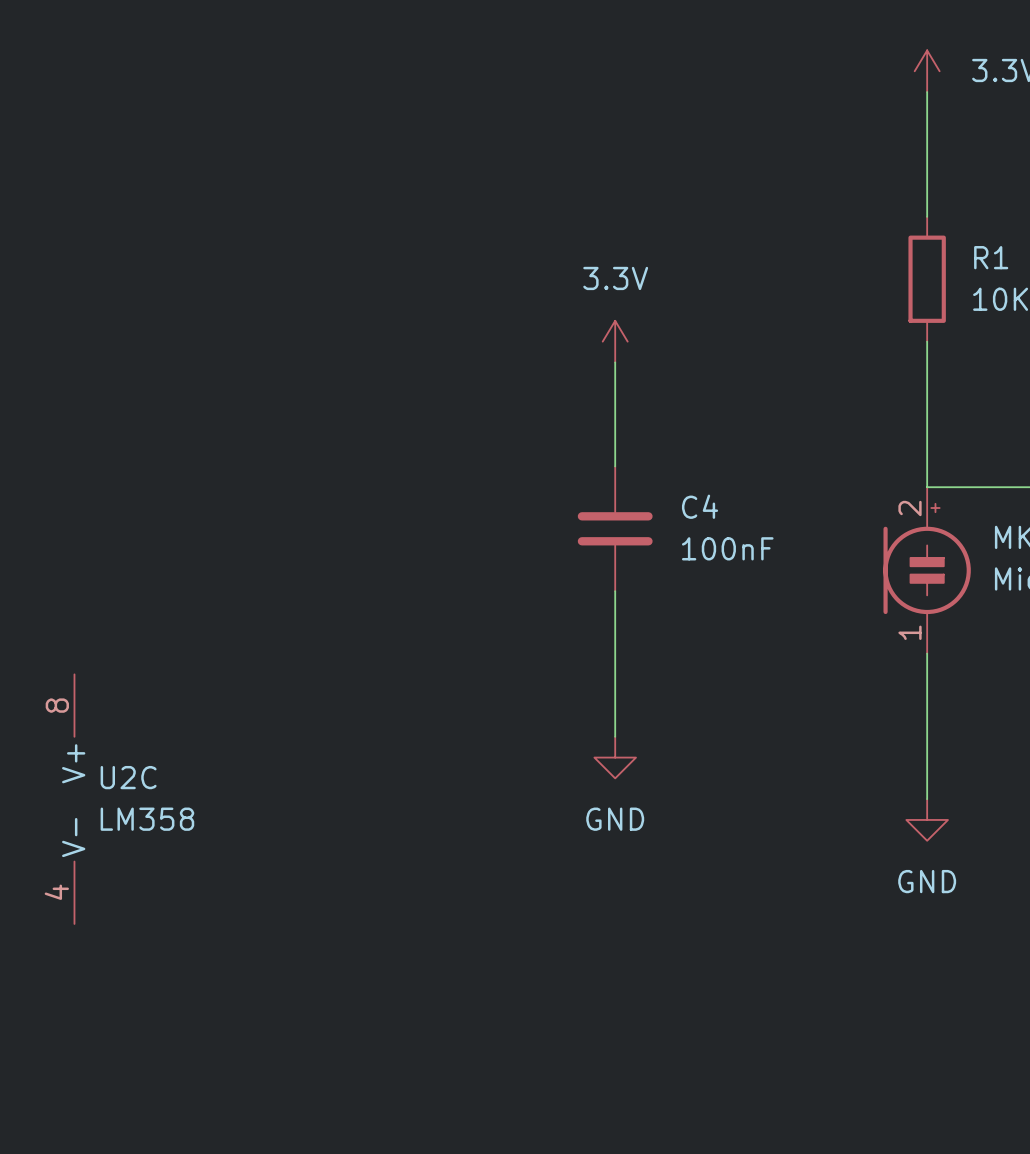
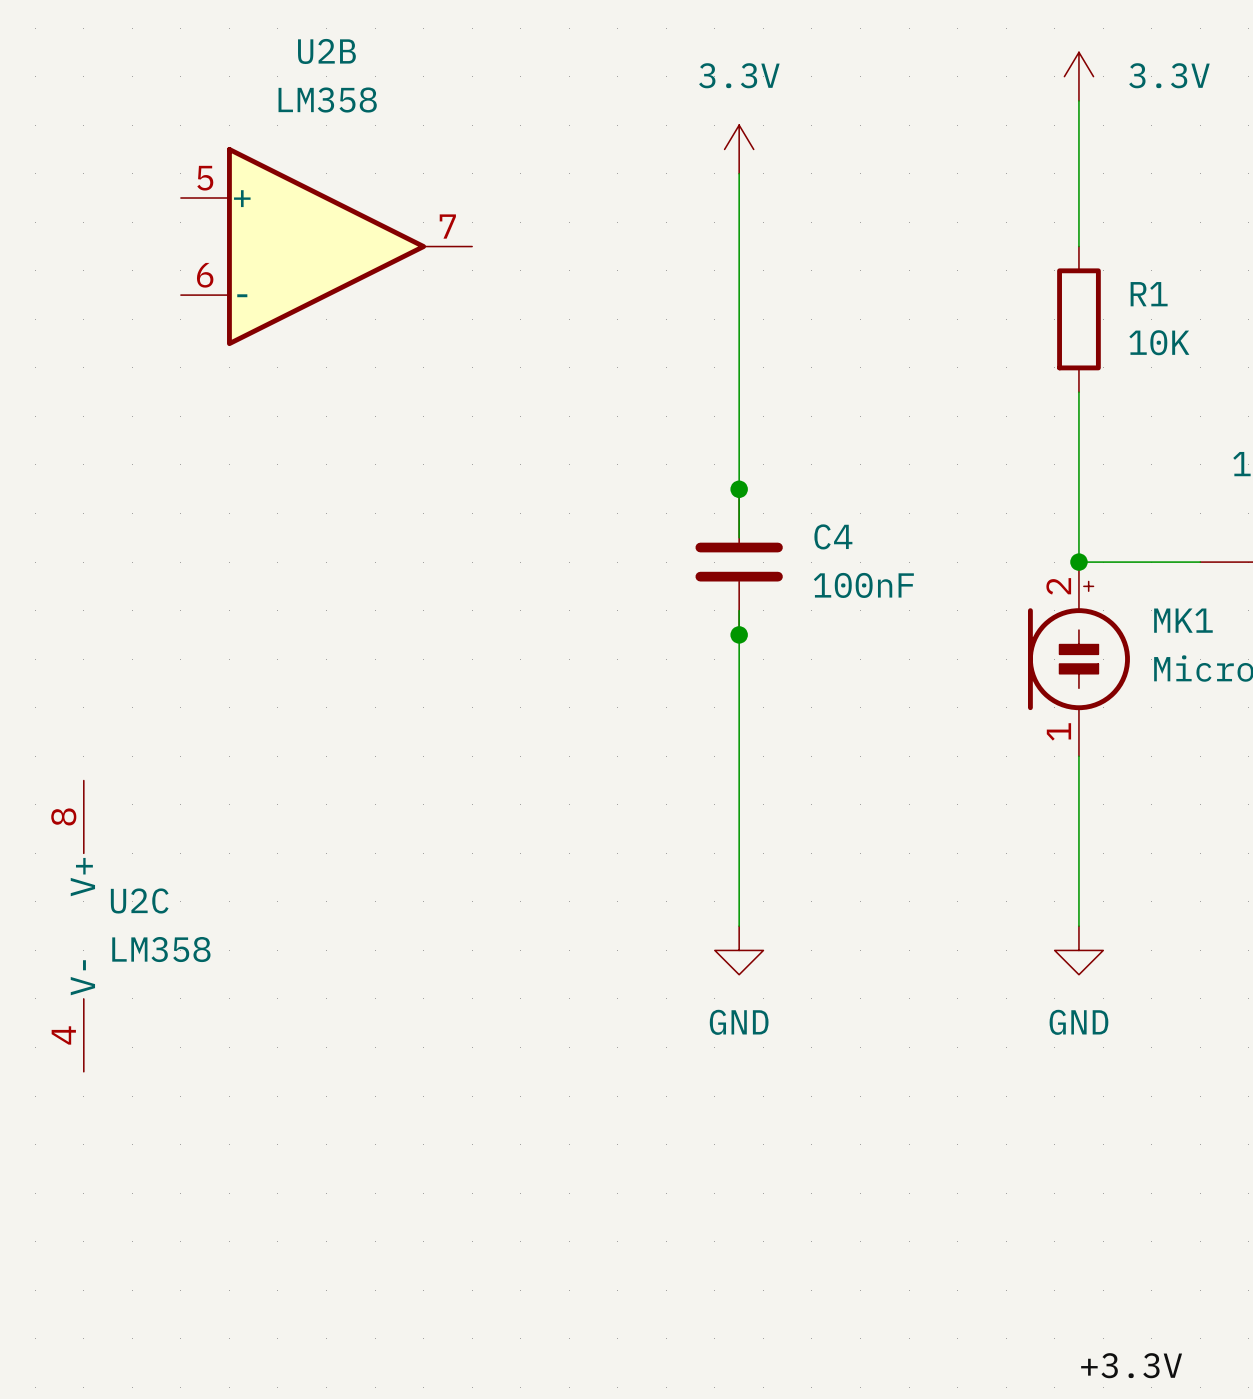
wire: none -> (739, 173) (739, 537)
U2B: none -> LM358 (326, 246)
power symbol position: 3.3V (615, 341) -> 3.3V (739, 149)
wire: (615, 362) (615, 466) -> none
junction: none -> (739, 489)
junction: none -> (1078, 562)
C4 position: (615, 528) -> (739, 562)
wire: none -> (739, 610) (739, 926)
junction: none -> (739, 634)
wire: (615, 591) (615, 736) -> none
power symbol position: GND (615, 757) -> GND (739, 950)

